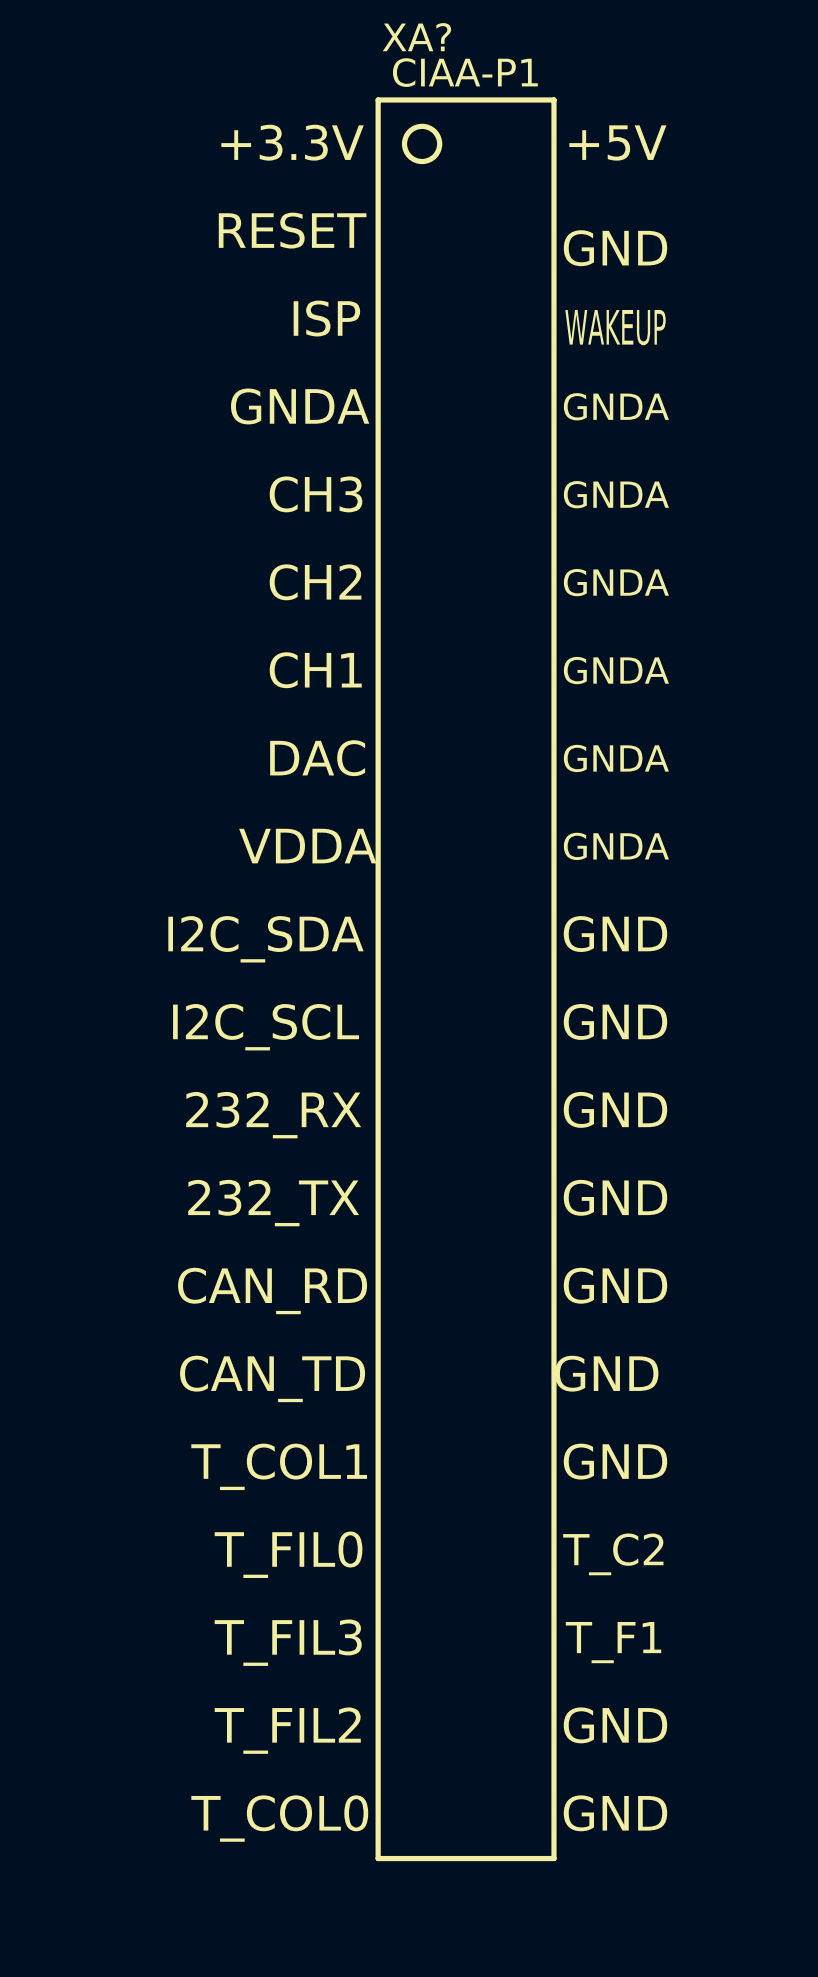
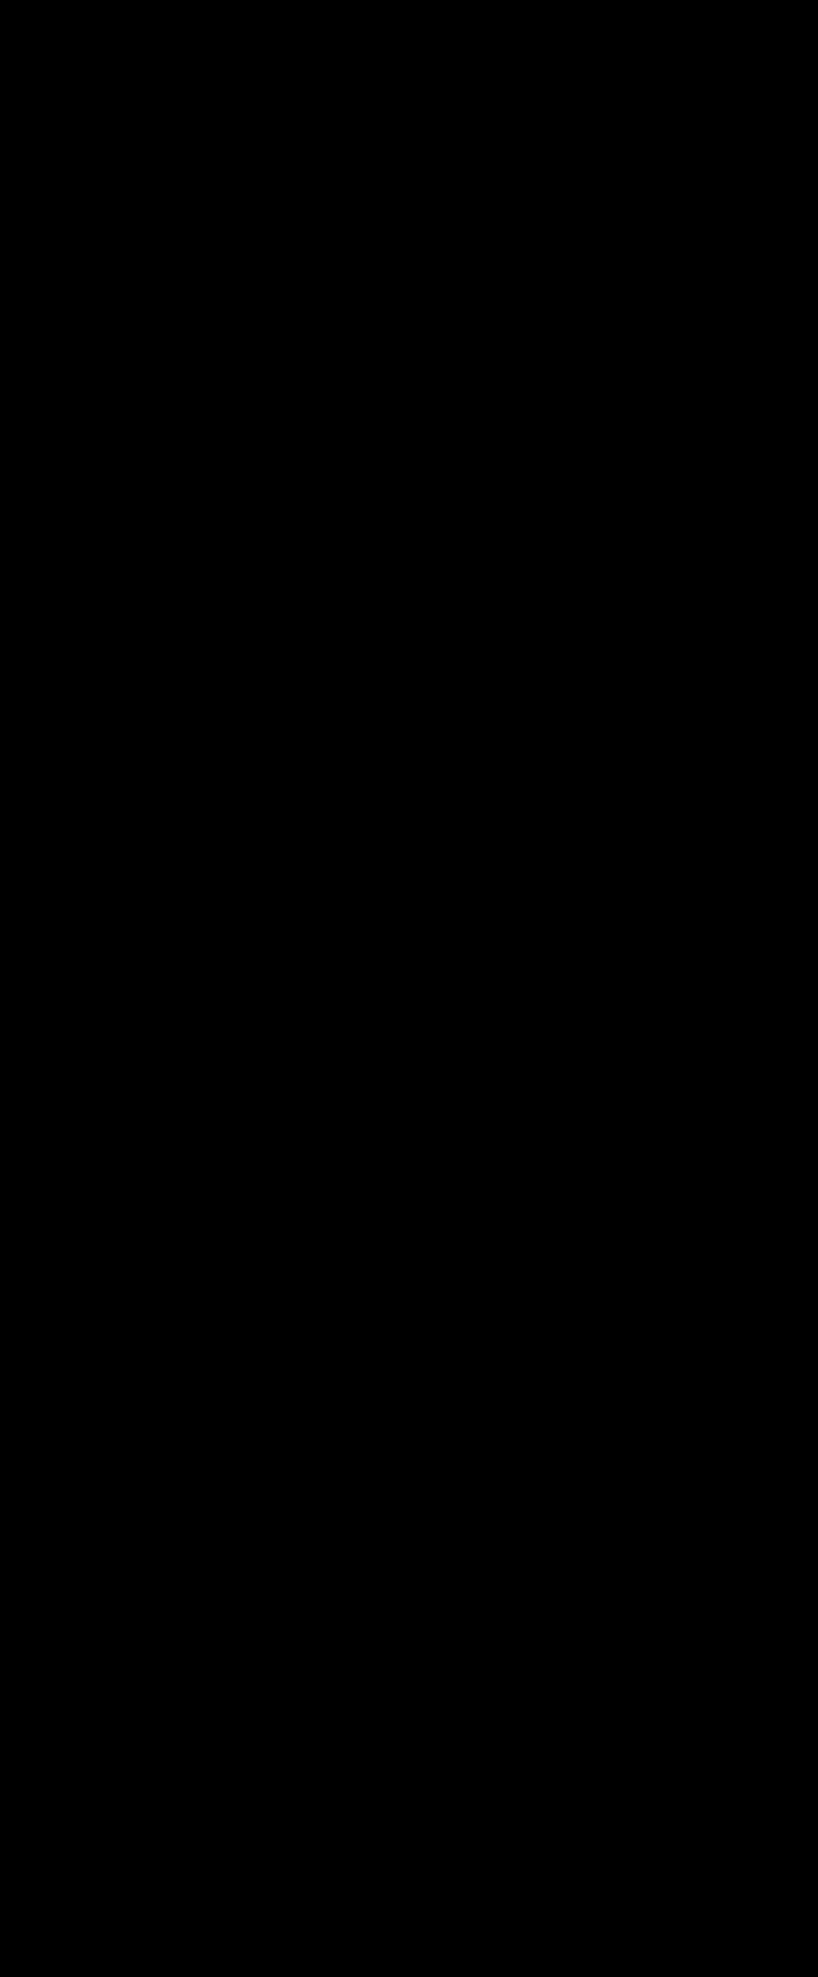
XA?: (466, 979) -> none

